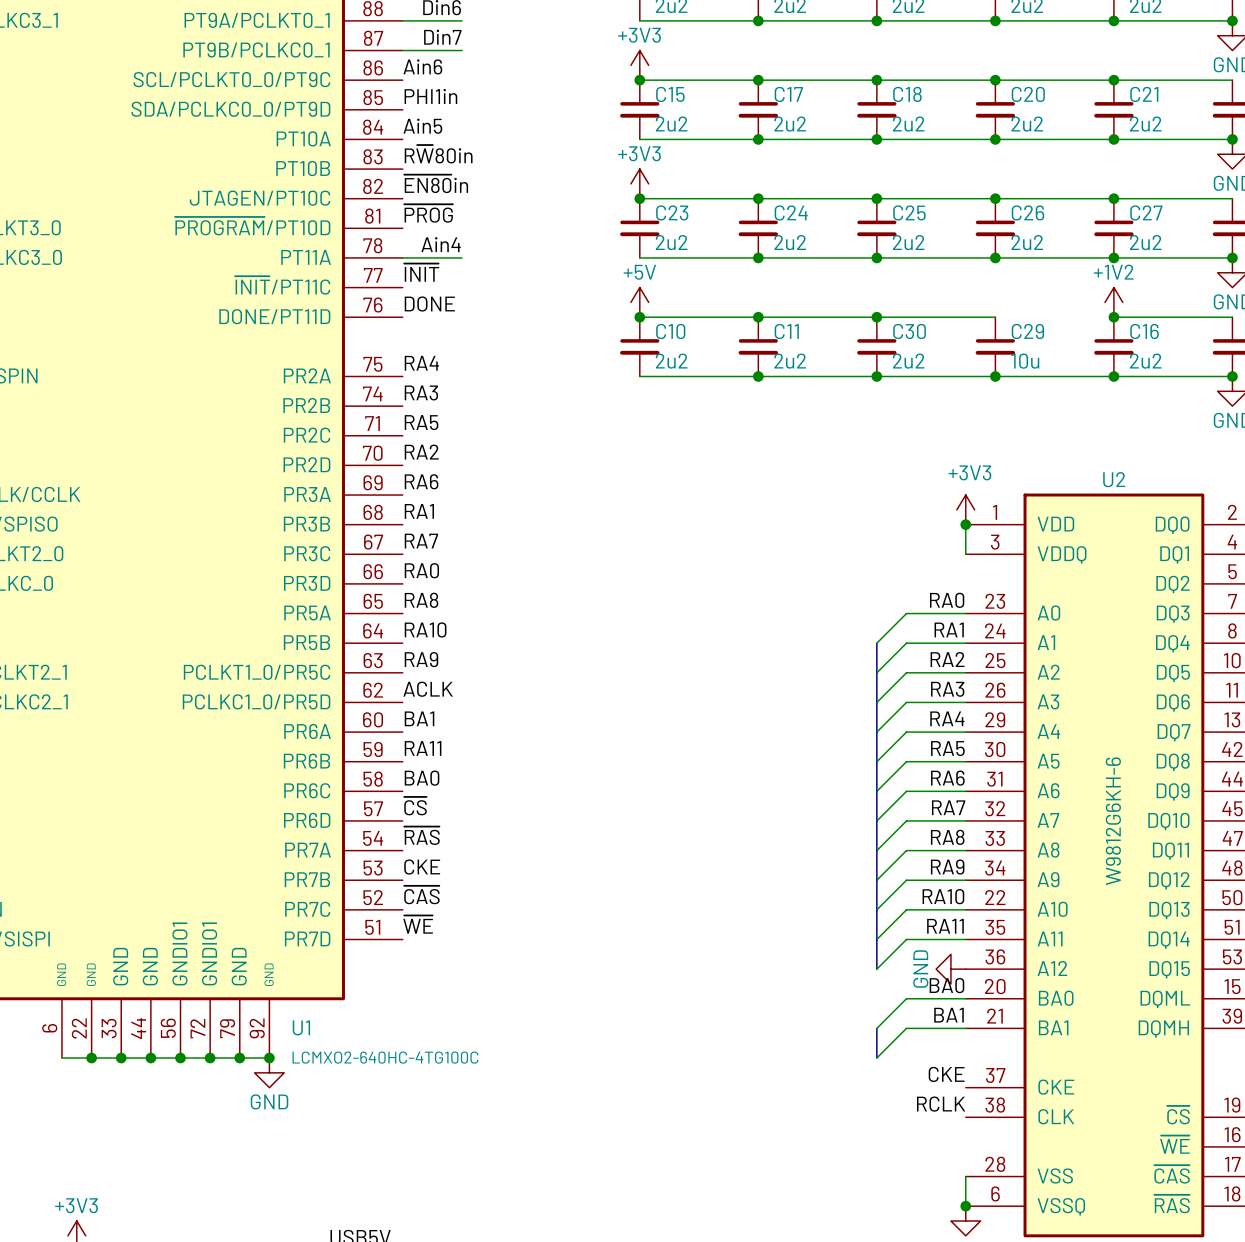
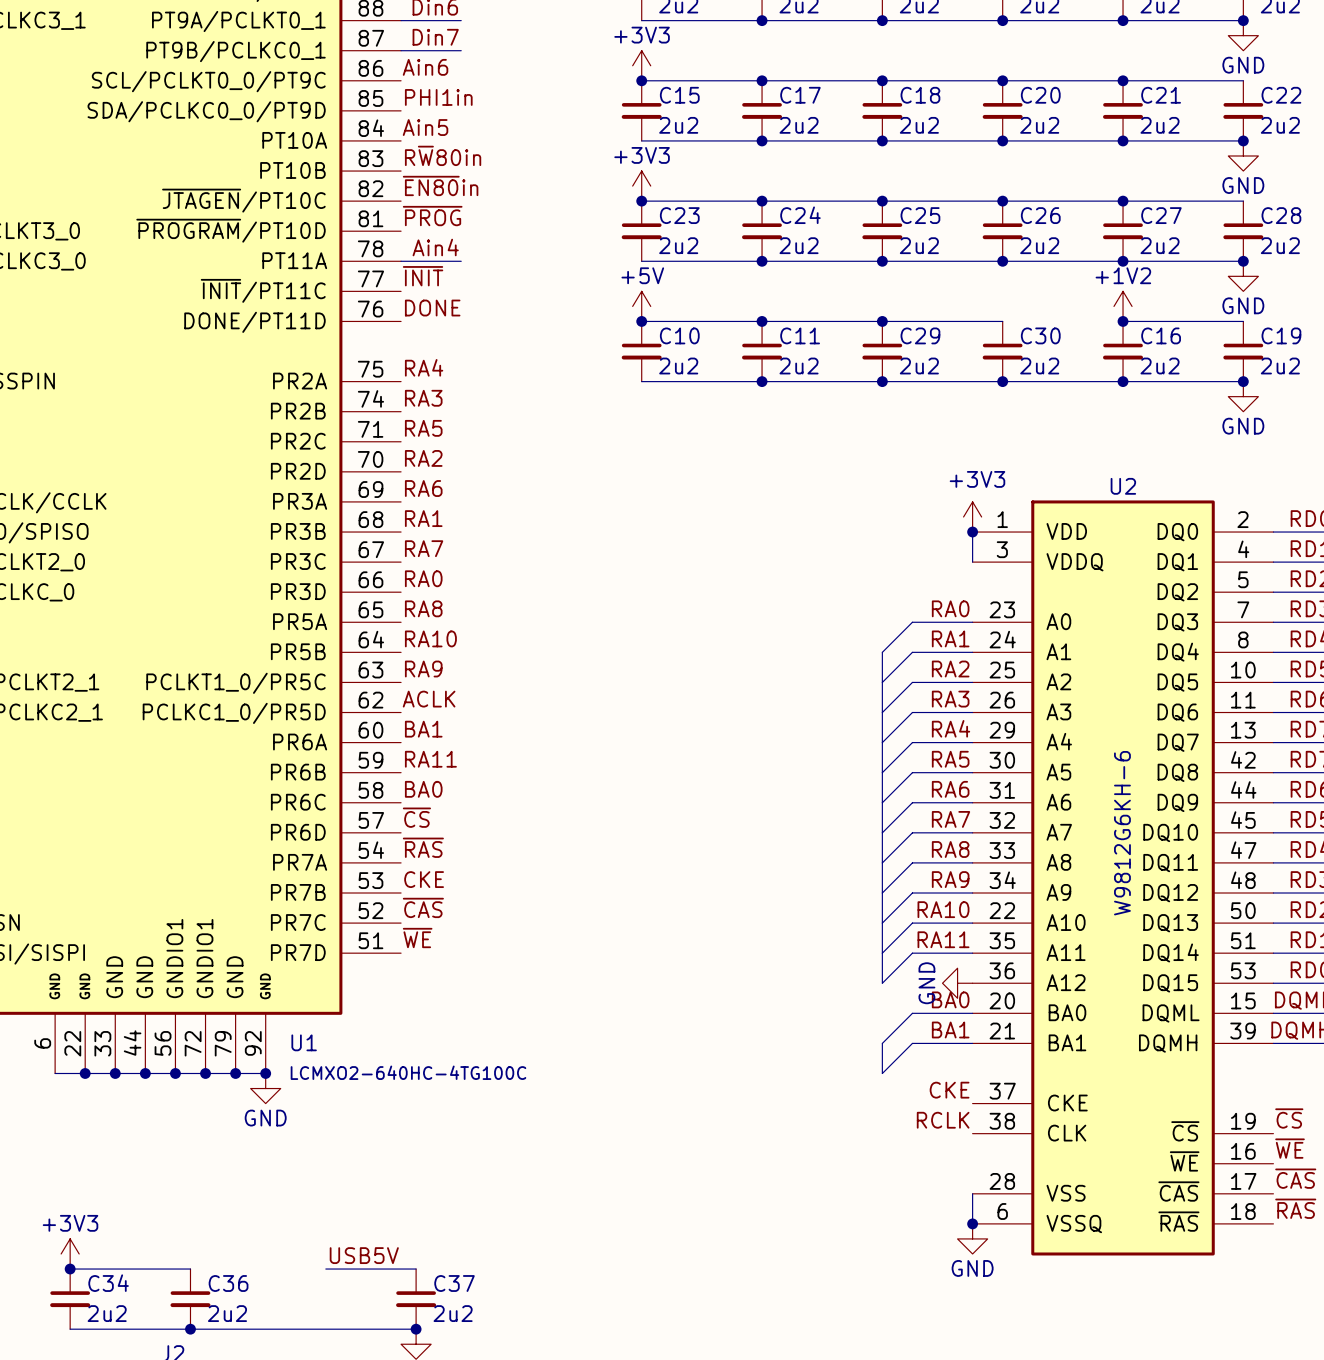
U1 pin name: JTAGEN/PT10C (260, 198) -> ~{JTAGEN}/PT10C (243, 200)
C30 name: C30 (909, 331) -> C29 (920, 335)
C29 name: C29 (1027, 331) -> C30 (1040, 335)
C29 value: 10u (1025, 361) -> 2u2 (1039, 366)

